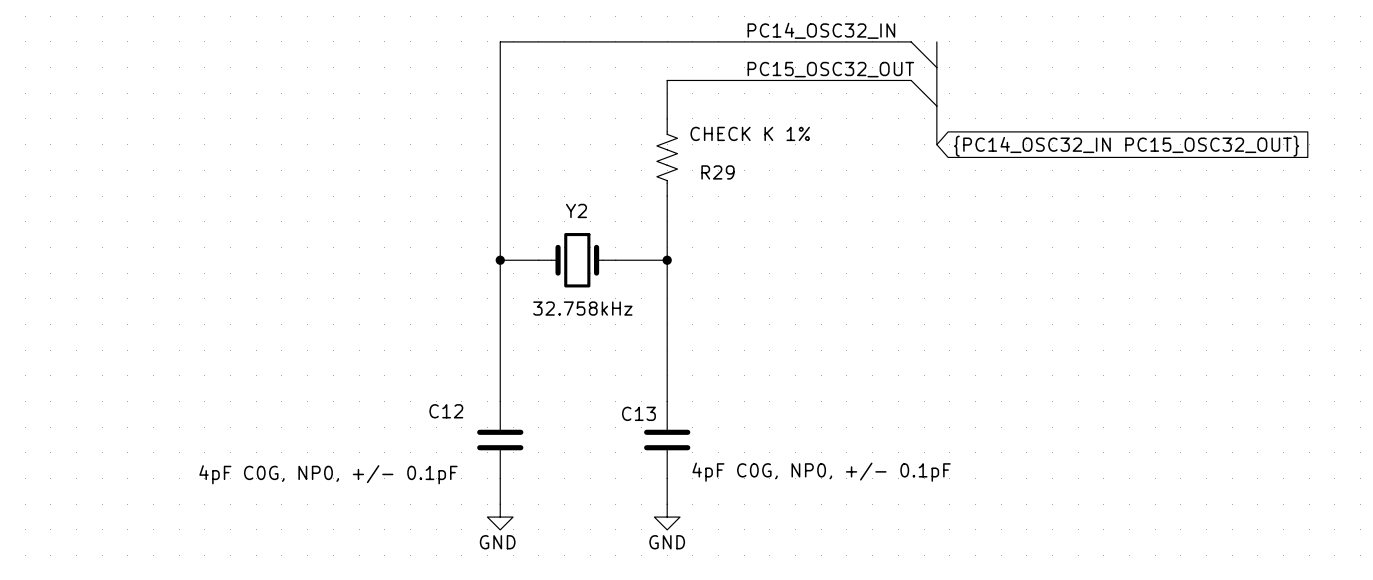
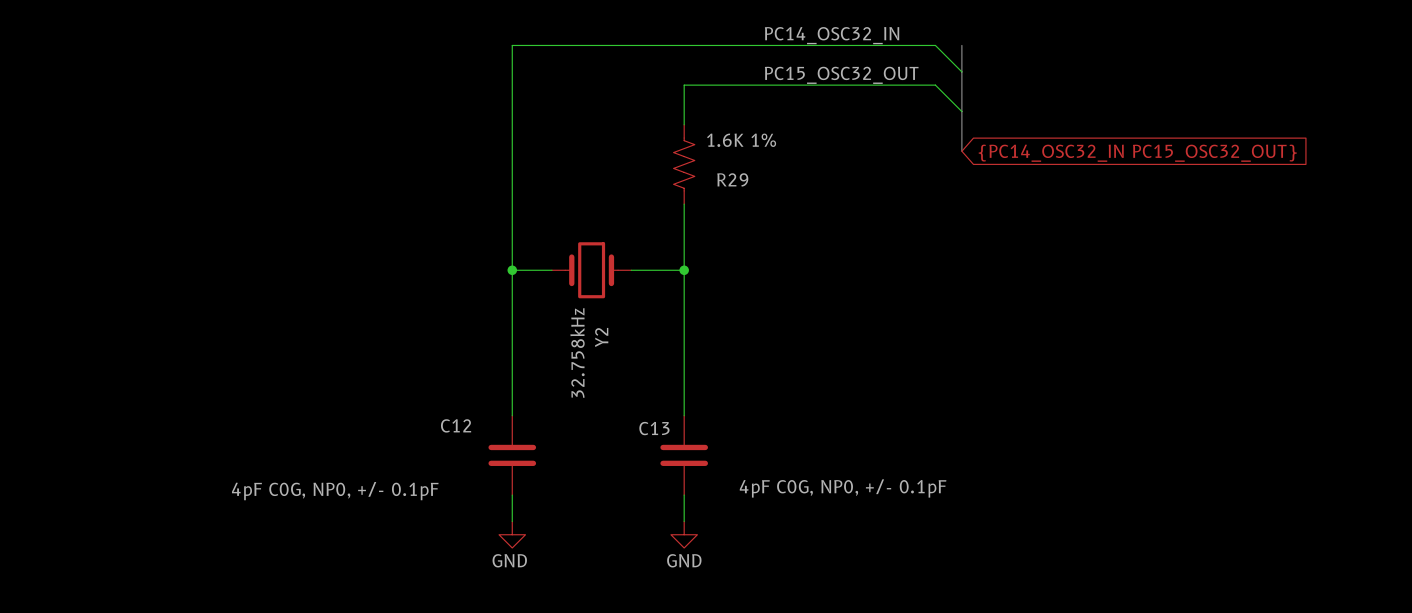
R29 value: CHECK K 1% (750, 133) -> 1.6K 1% (741, 140)
Y2 name rotation: 0° (576, 210) -> 90° counterclockwise (601, 337)
Y2 name position: Y2 (576, 210) -> Y2 (601, 337)
Y2 value rotation: 0° (582, 308) -> 90° counterclockwise (577, 352)

